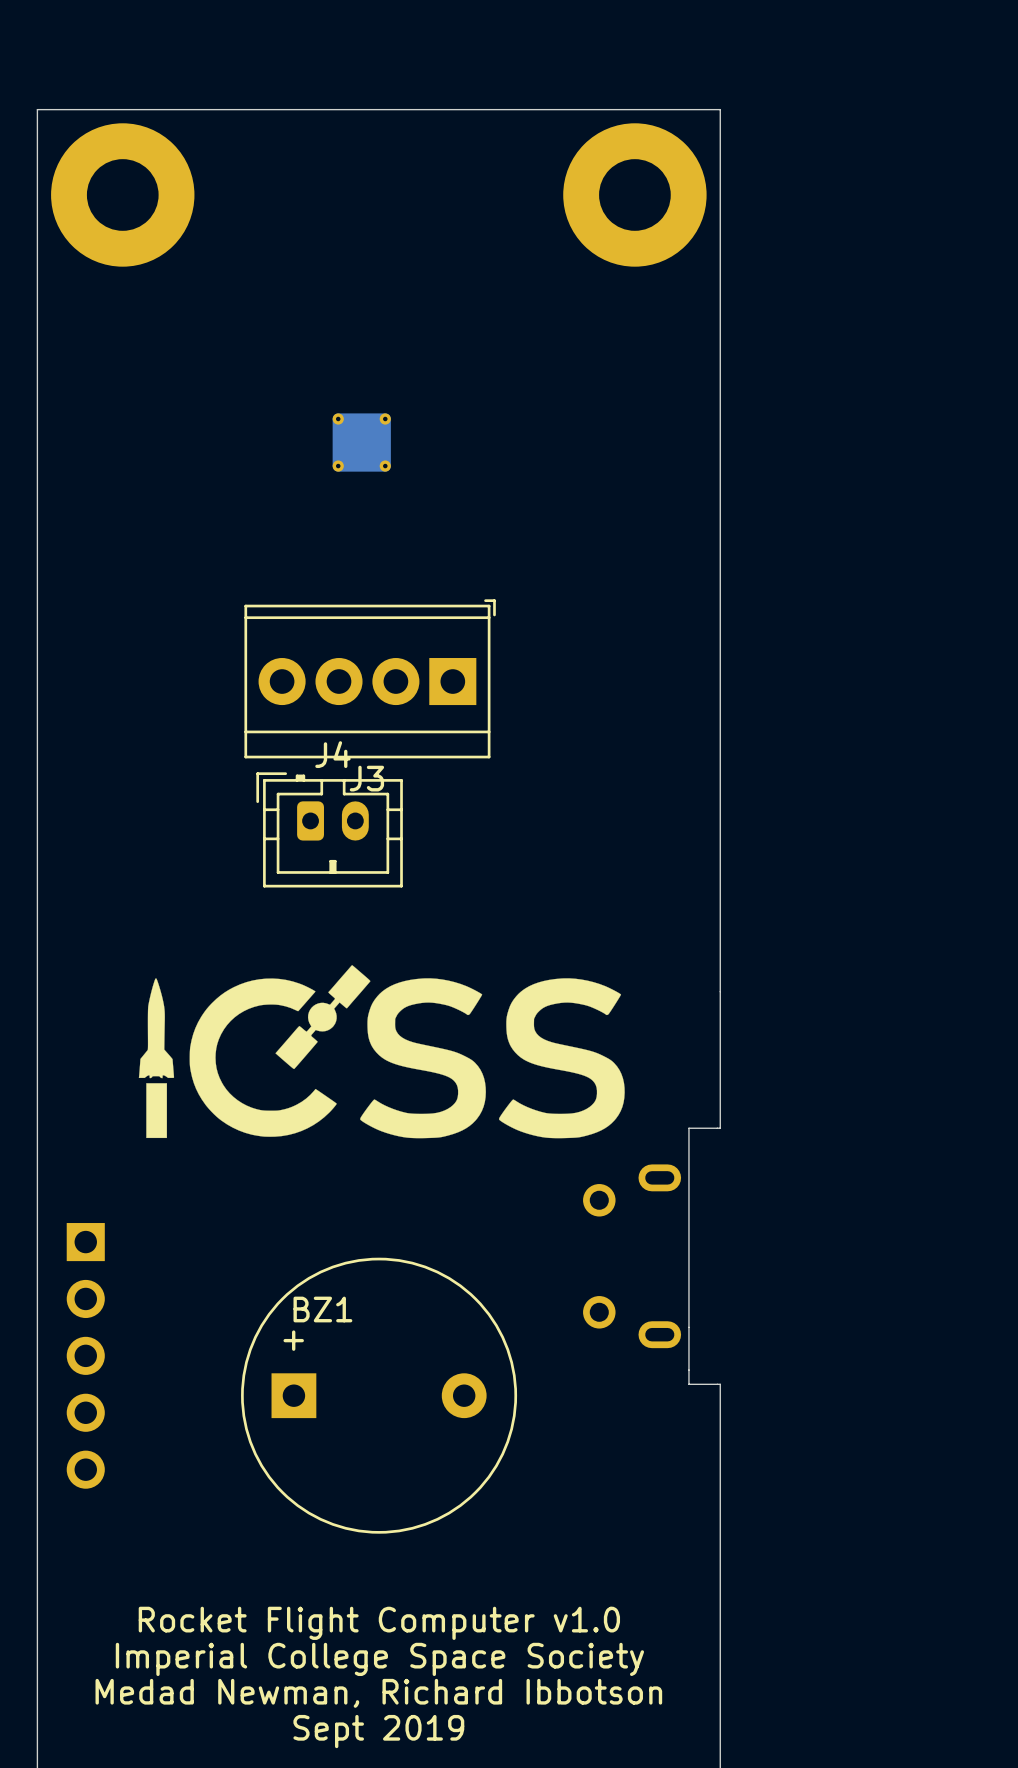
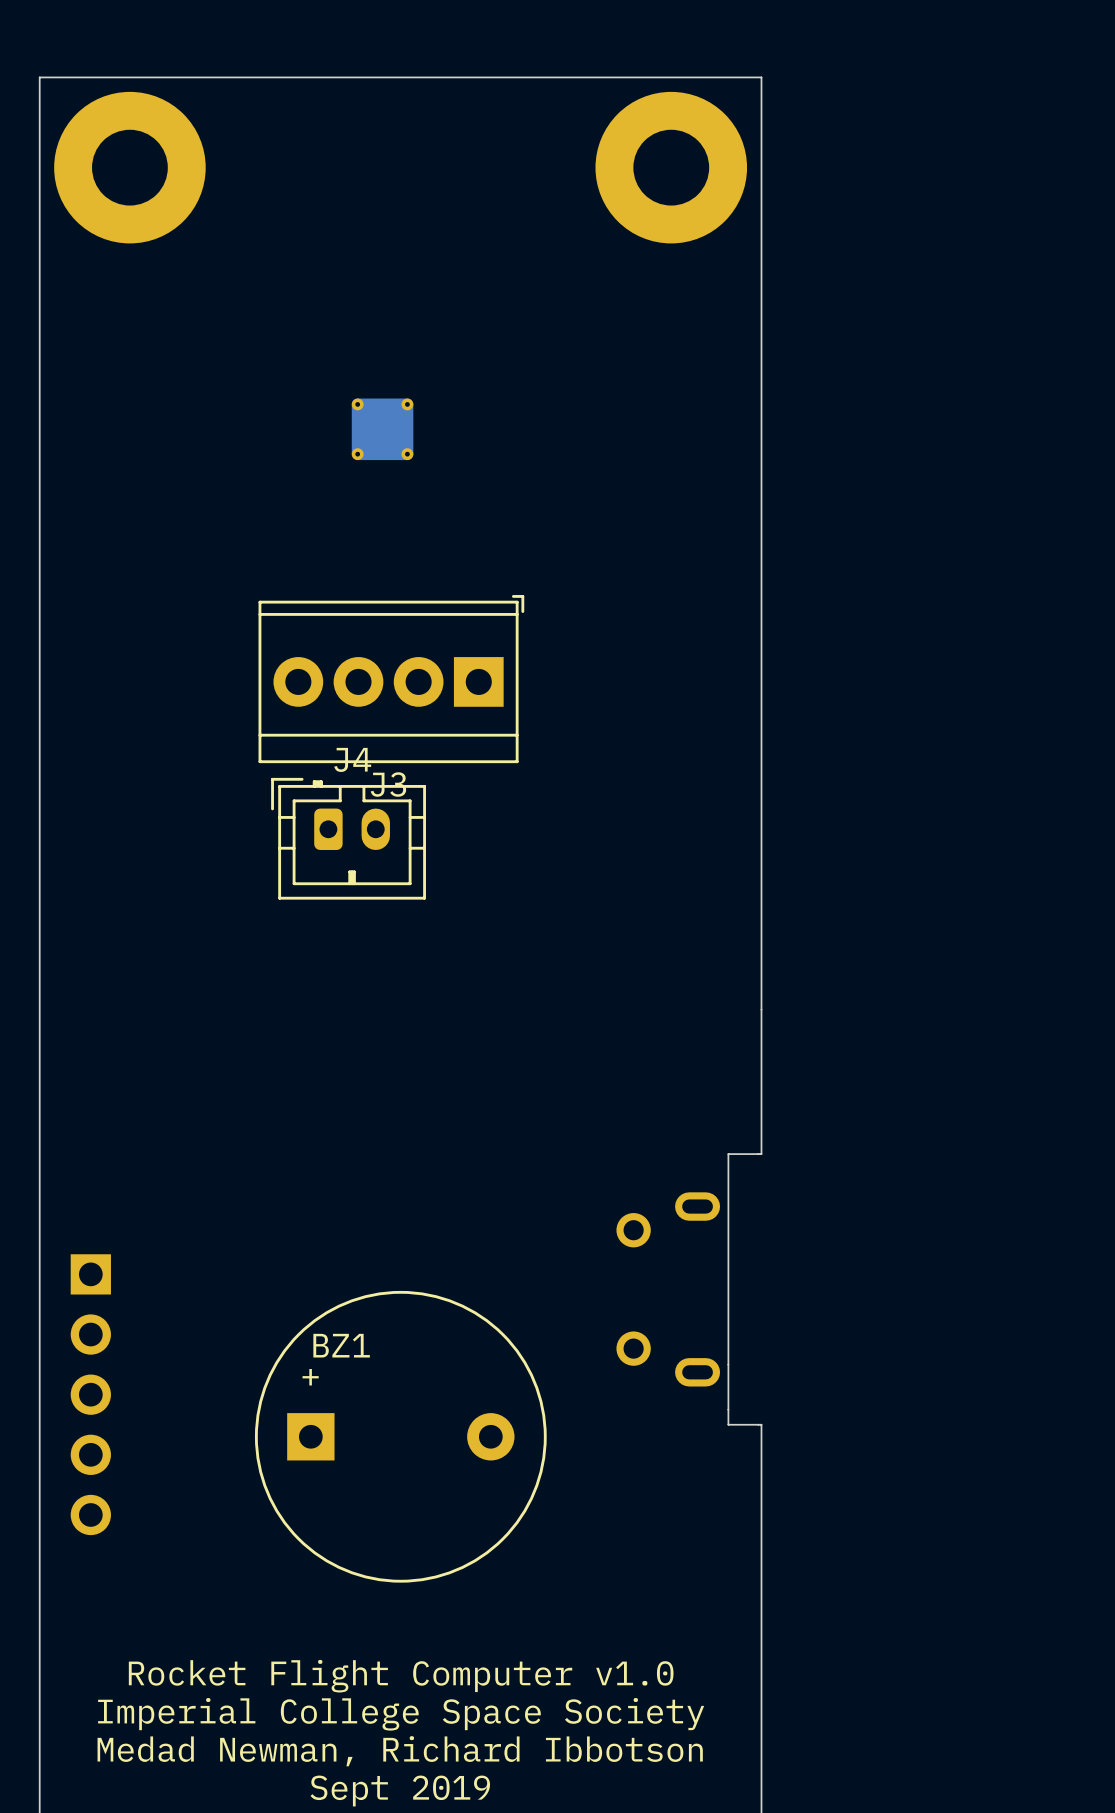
drawing: [138, 965, 625, 1139] -> none

